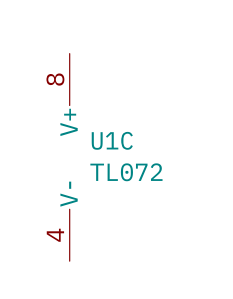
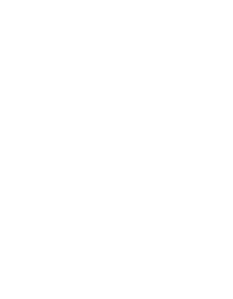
U1C: TL072 (69, 157) -> none

